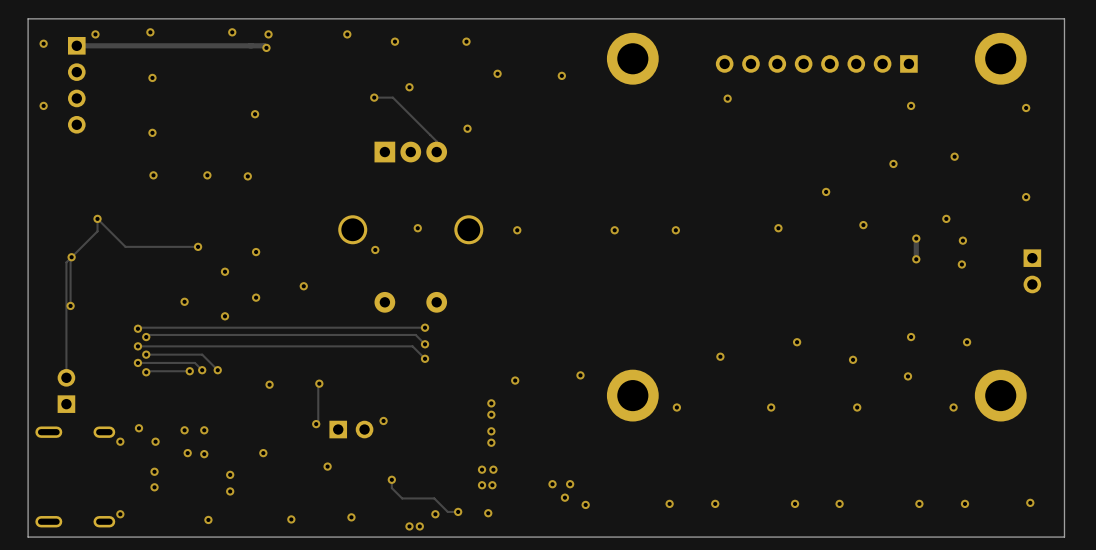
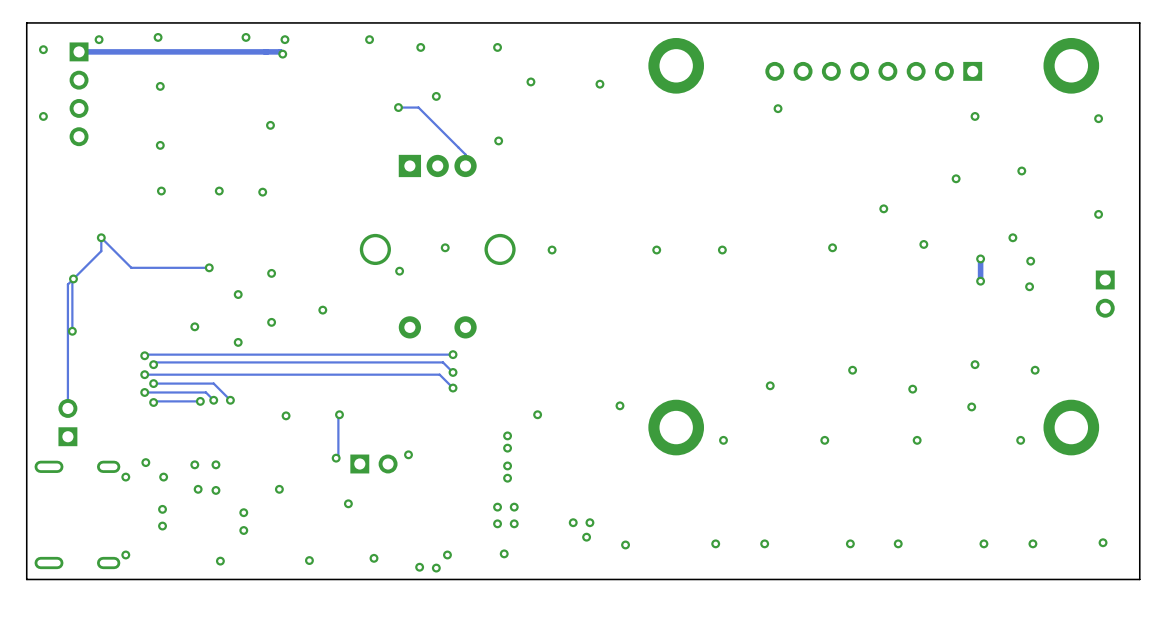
via: (515, 380) -> none
via: none -> (537, 414)
via: none -> (507, 435)
via: (491, 403) -> none
via: none -> (507, 448)
via: (491, 414) -> none
via: none -> (507, 465)
via: (491, 431) -> none
via: none -> (507, 478)
via: (491, 442) -> none
via: none -> (497, 507)
via: (493, 469) -> none
track: (391, 479) (391, 488) (402, 498) (434, 498) (447, 511) (458, 511) -> none
via: (391, 479) -> none
via: none -> (573, 522)
via: (570, 484) -> none
via: none -> (497, 523)
via: (492, 485) -> none
via: none -> (586, 537)
via: (564, 497) -> none
via: (458, 511) -> none
via: none -> (504, 553)
via: (488, 513) -> none
via: none -> (447, 554)
via: (435, 514) -> none
via: none -> (419, 567)
via: (419, 526) -> none

